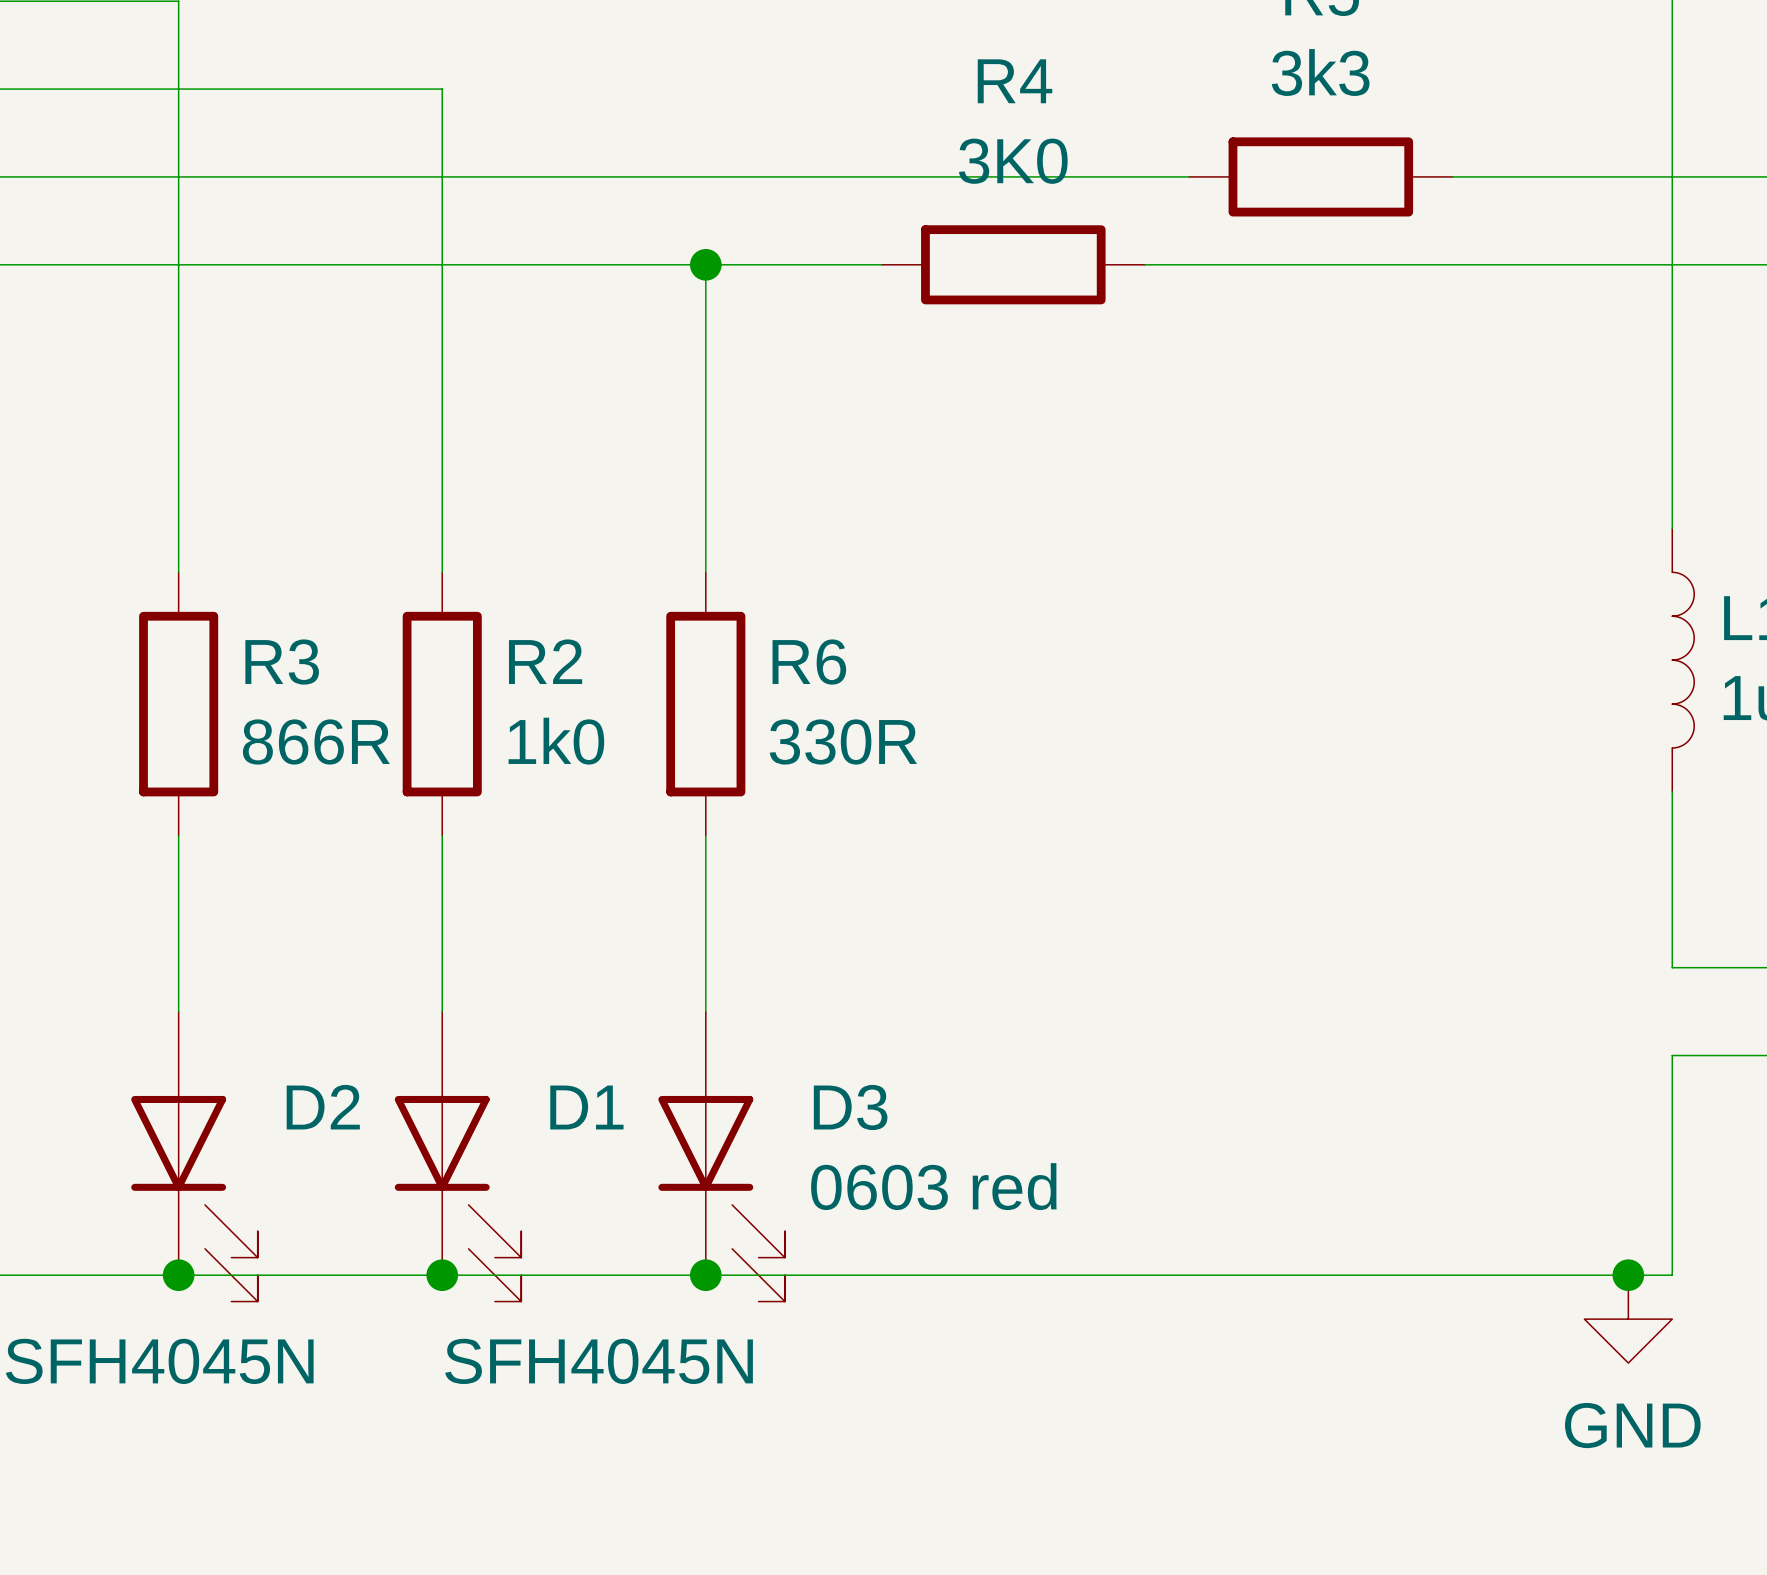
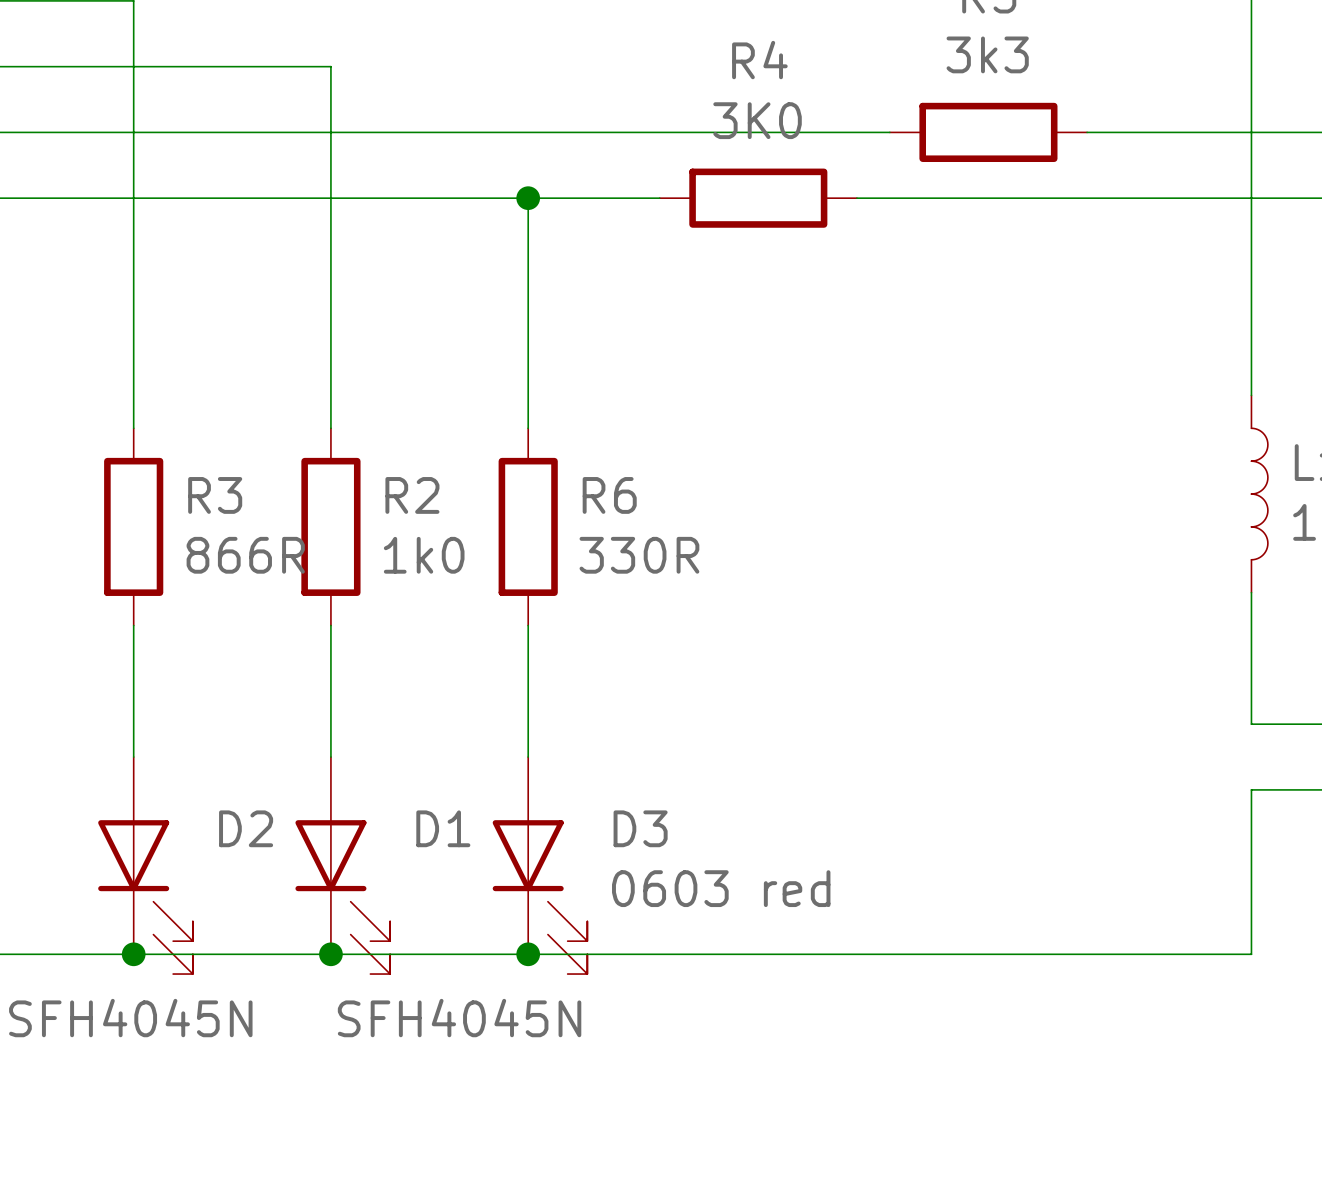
junction: (1628, 1275) -> none
power symbol: GND (1628, 1319) -> none

